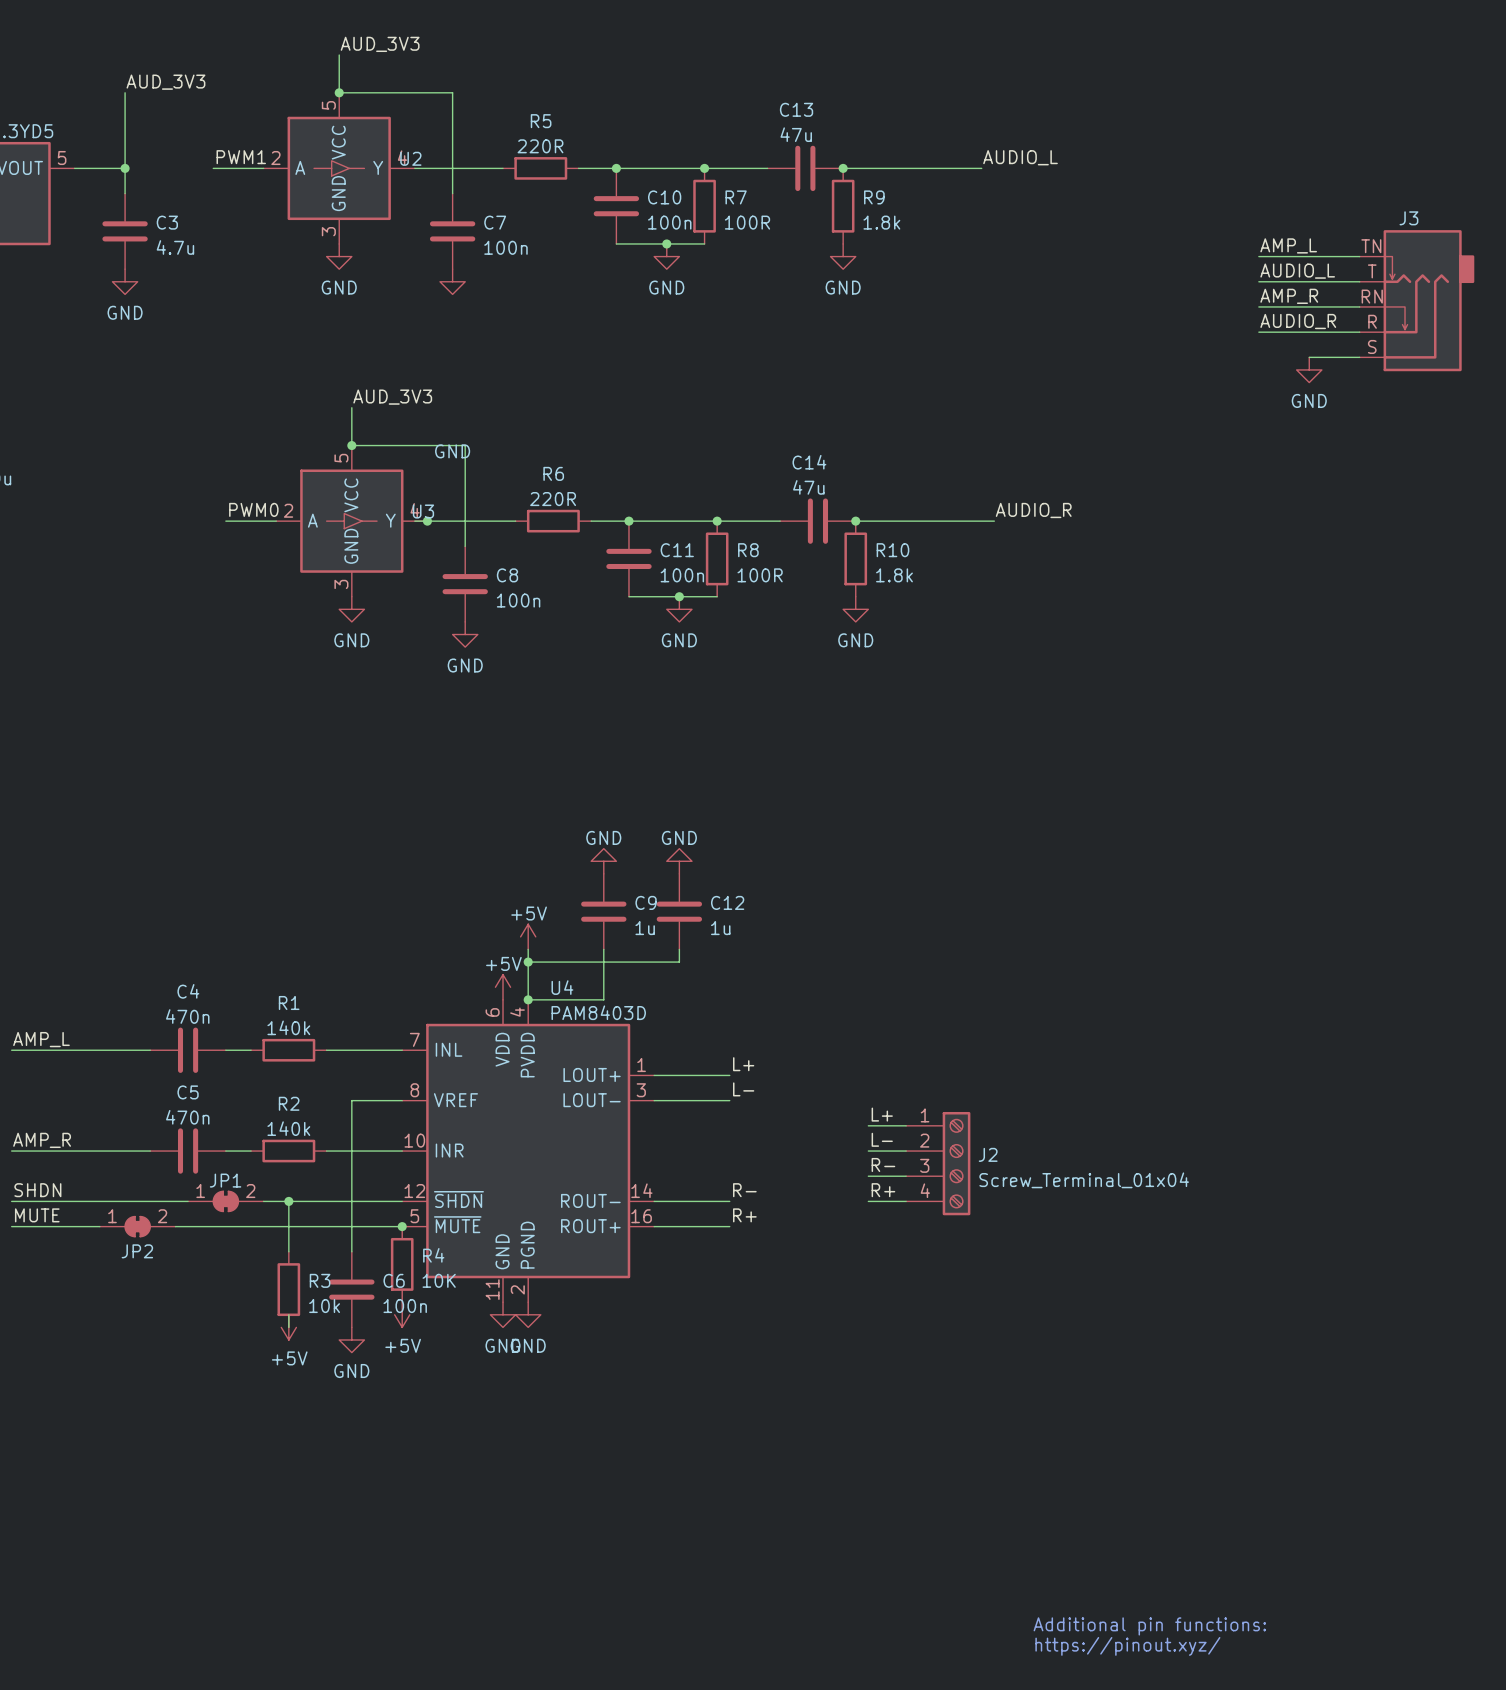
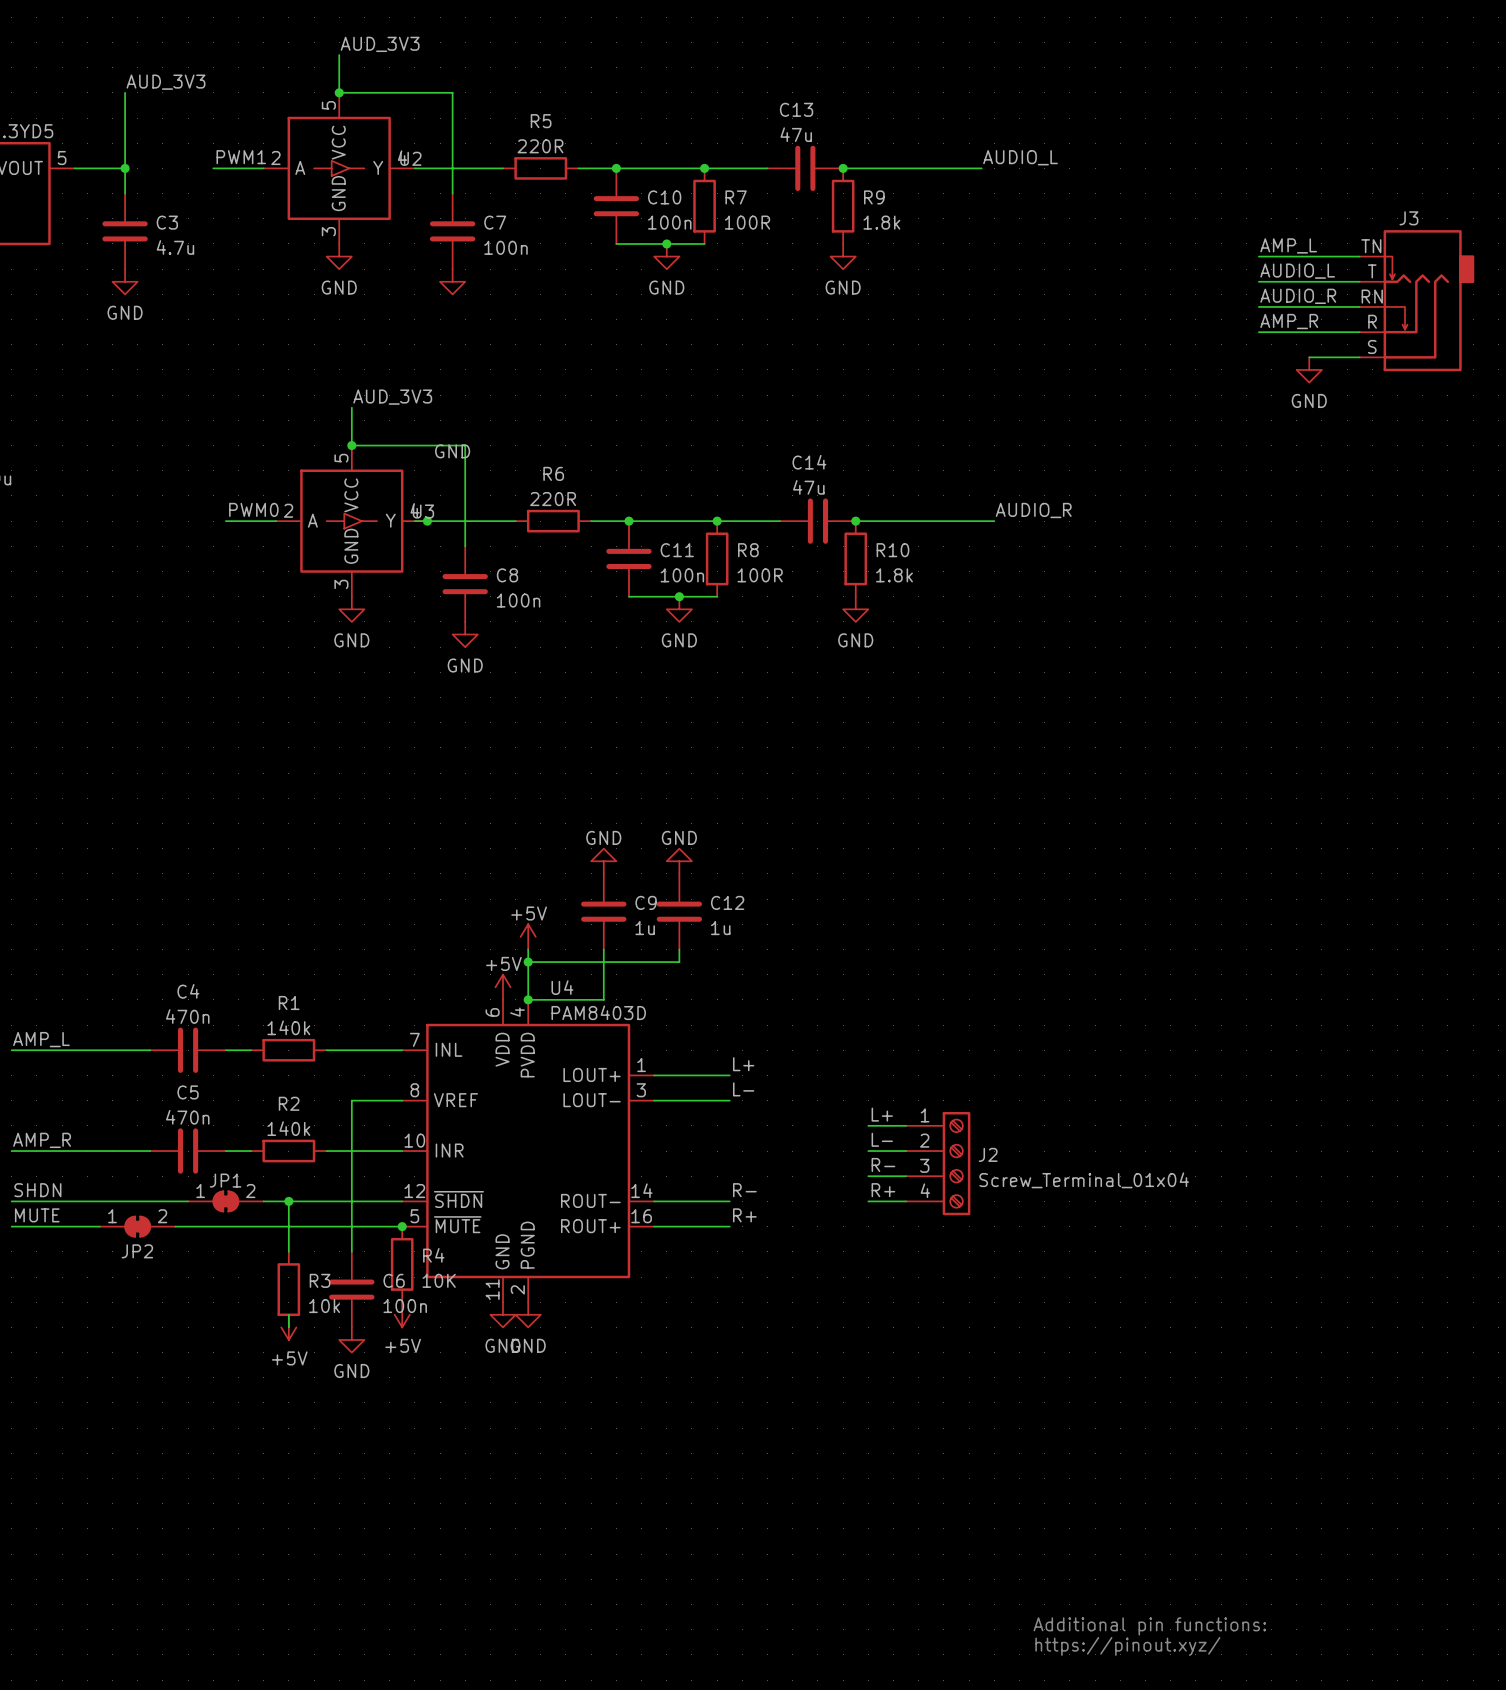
label: AMP_R (1289, 296) -> AUDIO_R (1298, 296)
label: AUDIO_R (1298, 321) -> AMP_R (1289, 321)

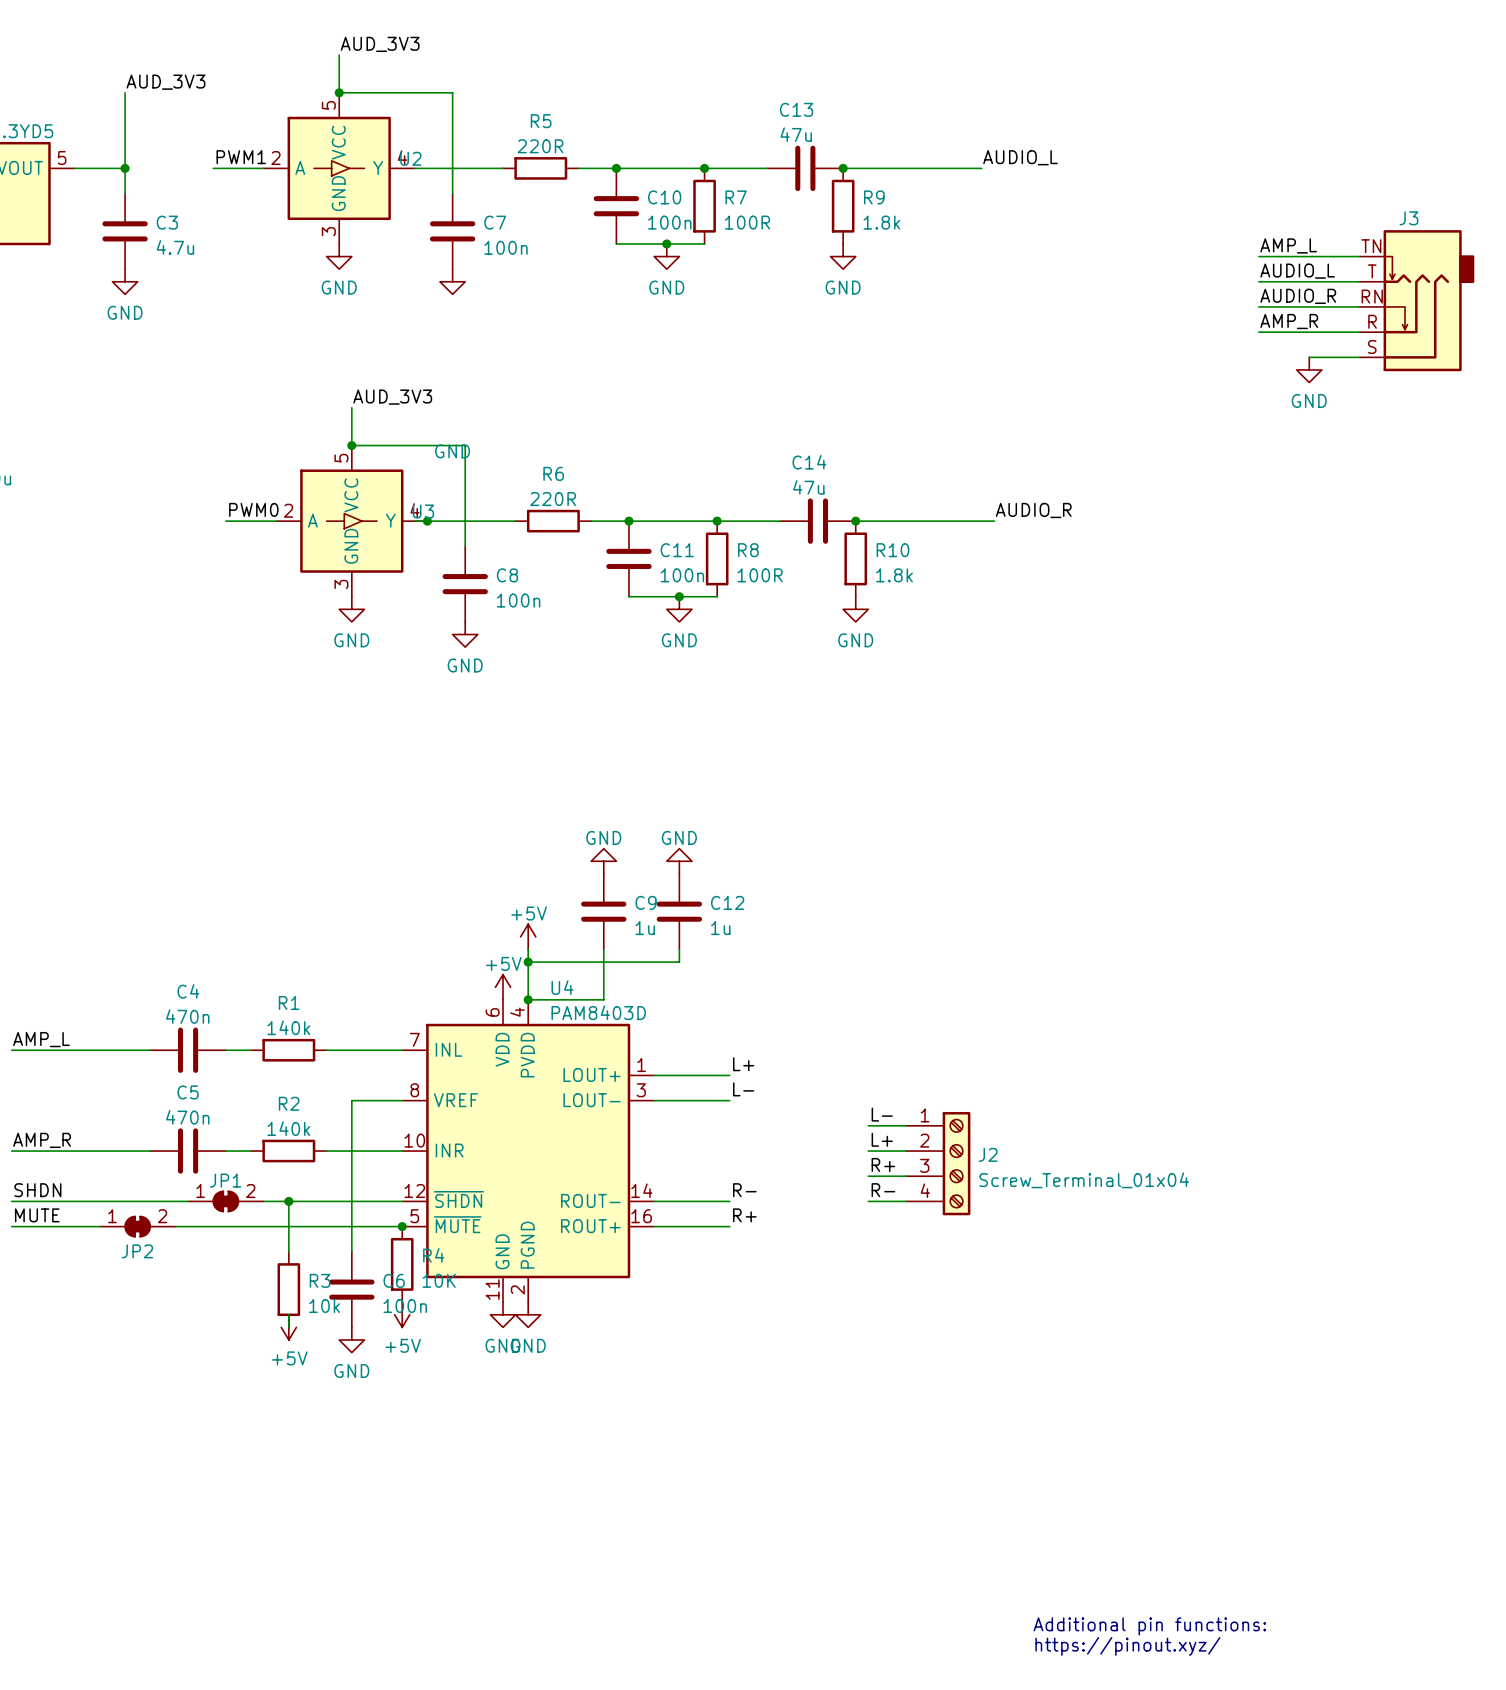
label: L+ (882, 1114) -> L- (882, 1114)
label: L- (882, 1139) -> L+ (882, 1139)
label: R- (883, 1164) -> R+ (883, 1164)
label: R+ (883, 1190) -> R- (883, 1190)

